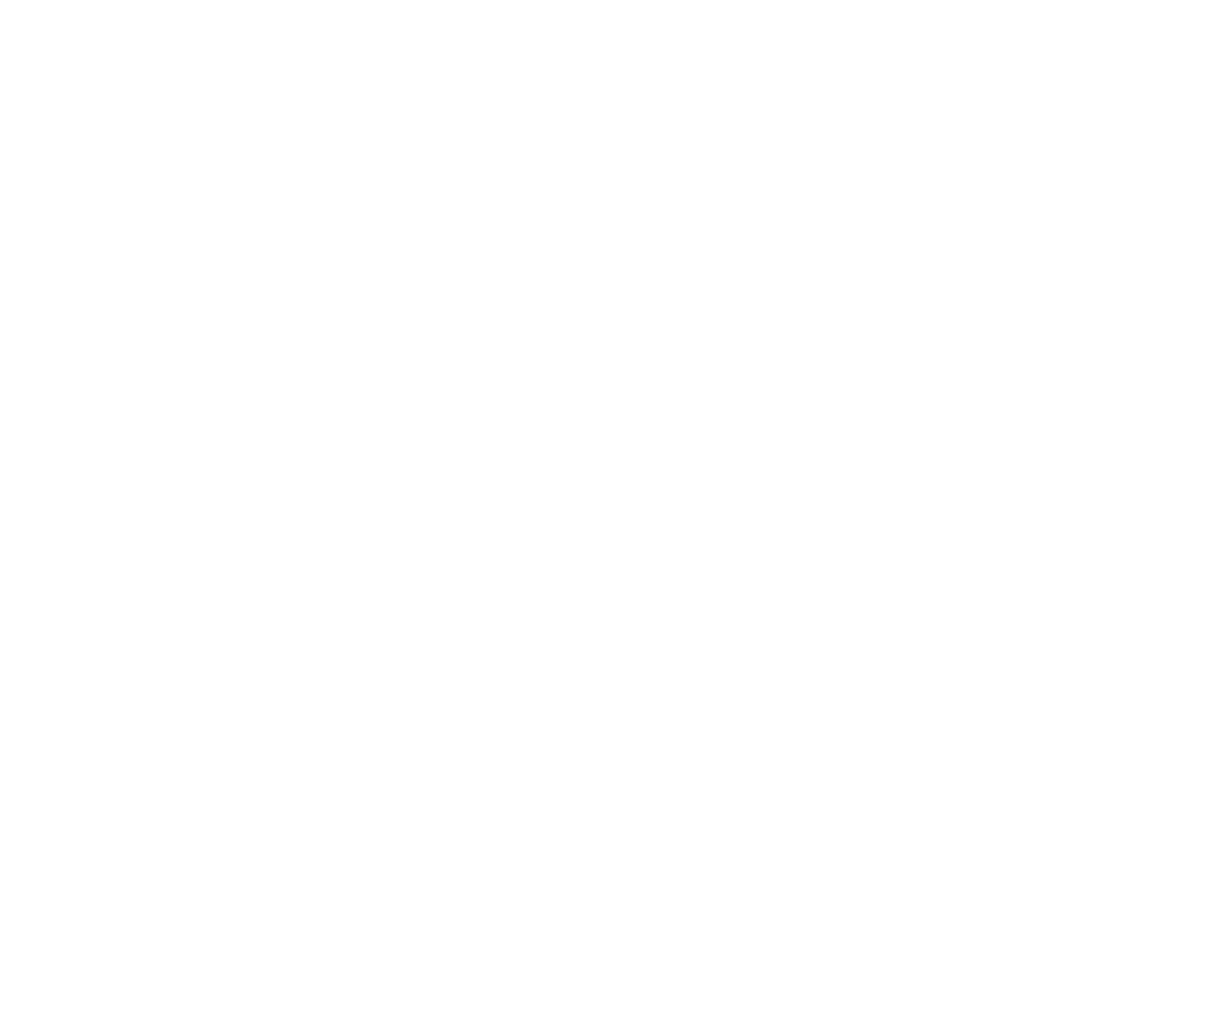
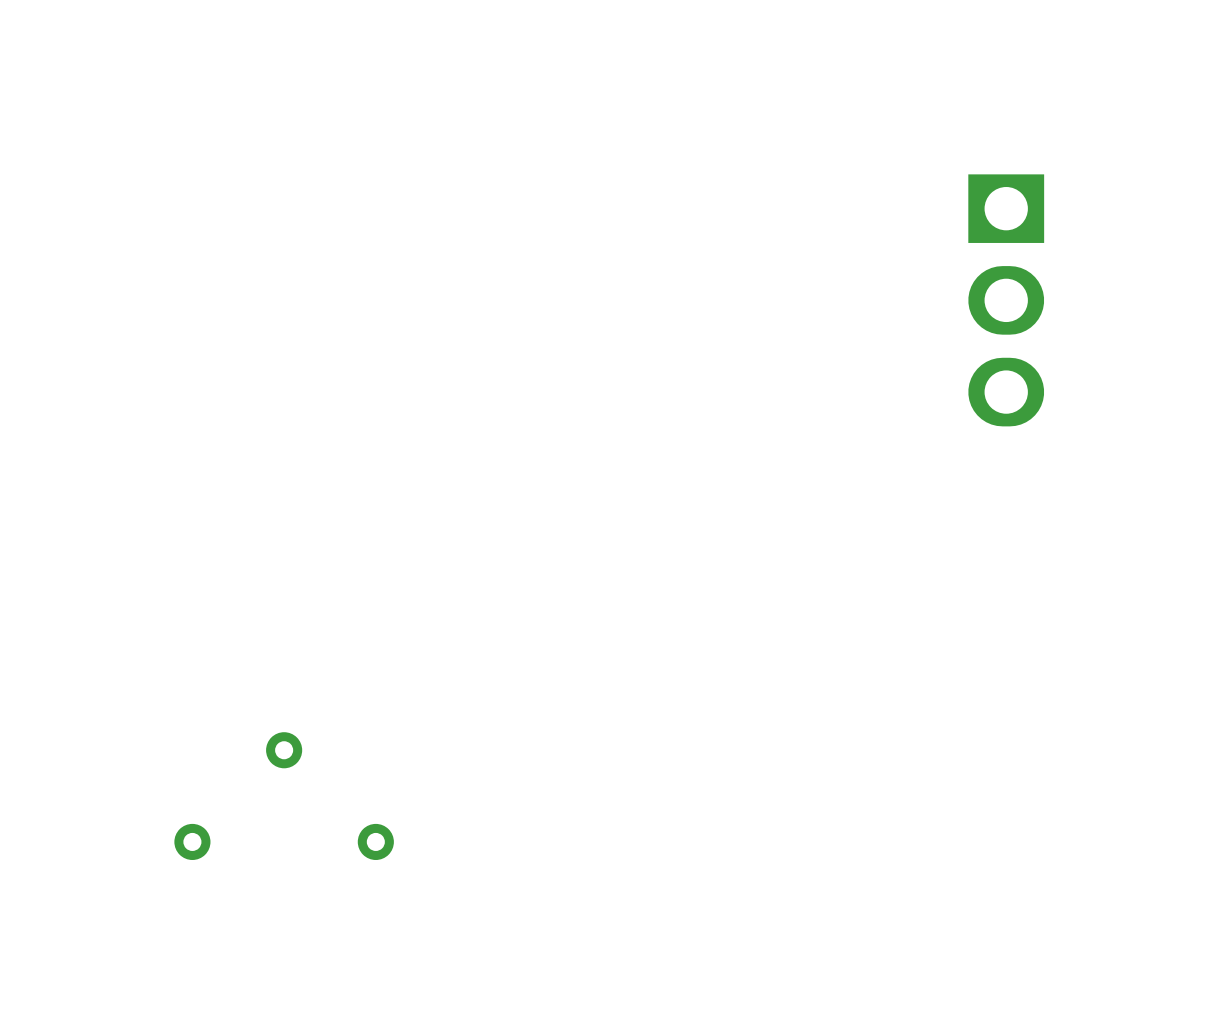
part: none -> (1006, 300)
part: none -> (284, 796)

